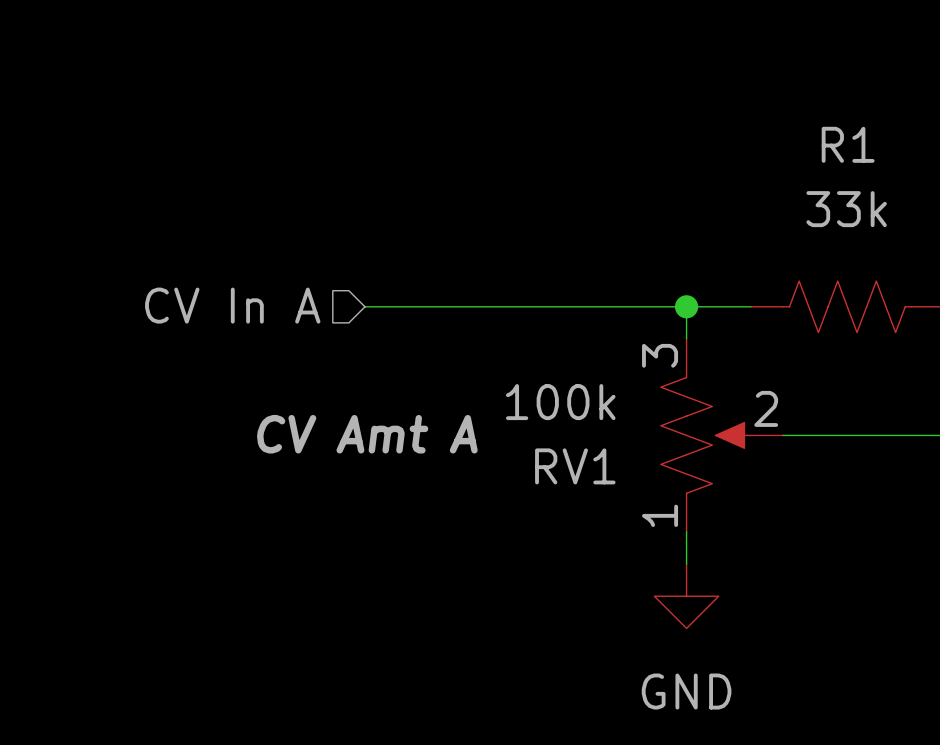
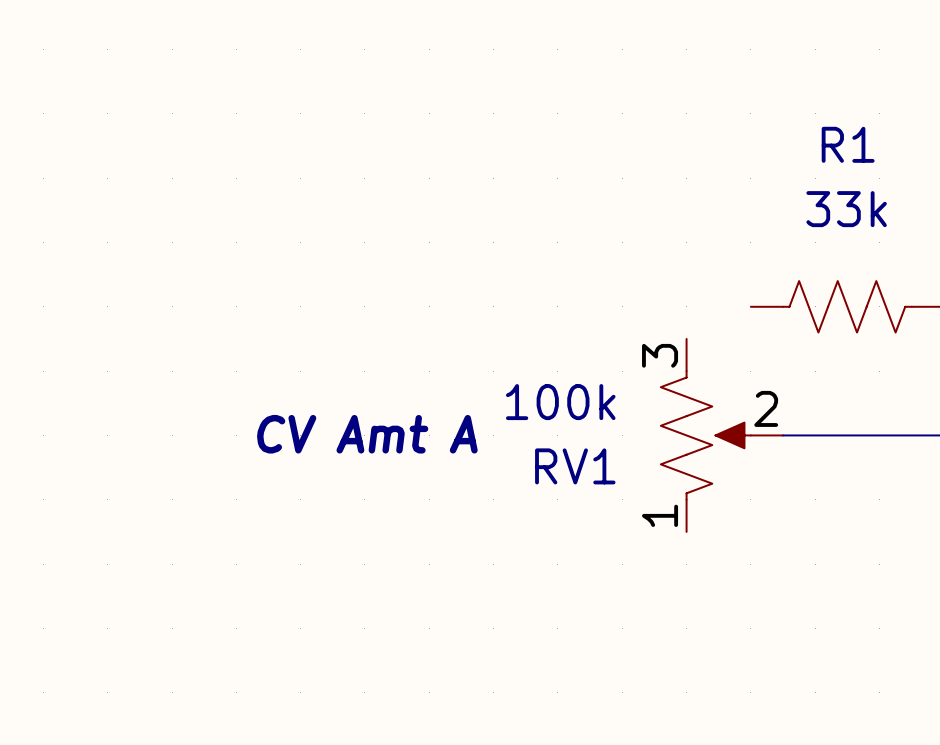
hierarchical label: CV In A (232, 305) -> none
wire: (364, 306) (750, 306) -> none
wire: (686, 306) (686, 338) -> none
junction: (686, 306) -> none
wire: (686, 531) (686, 564) -> none
power symbol: GND (686, 596) -> none

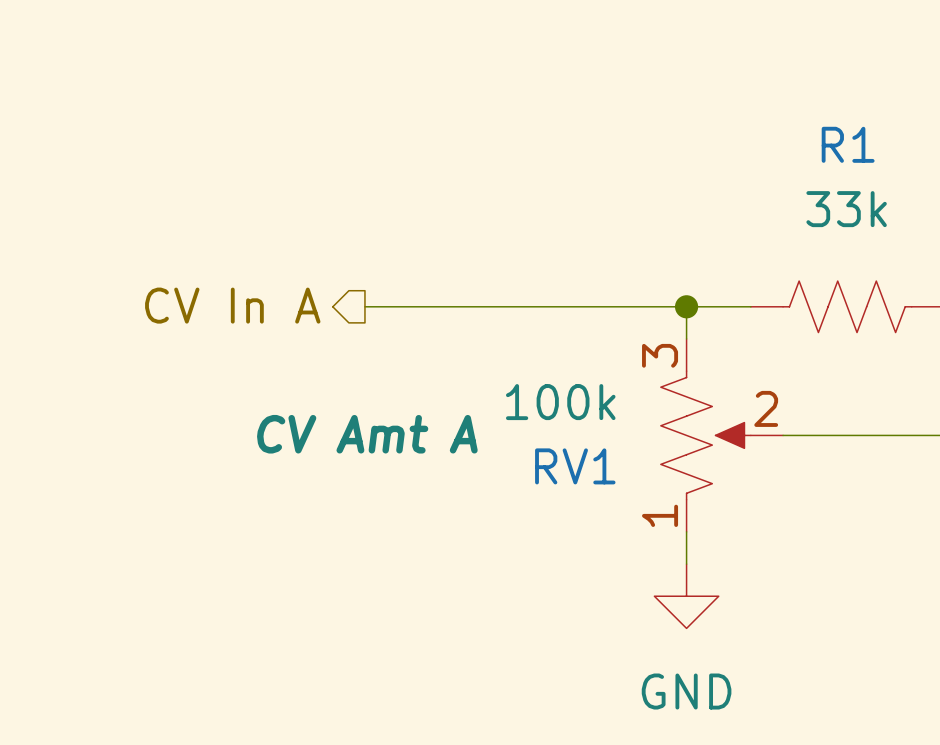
hierarchical label: none -> CV In A (232, 305)
wire: none -> (364, 306) (750, 306)
wire: none -> (686, 306) (686, 338)
junction: none -> (686, 306)
wire: none -> (686, 531) (686, 564)
power symbol: none -> GND (686, 596)

